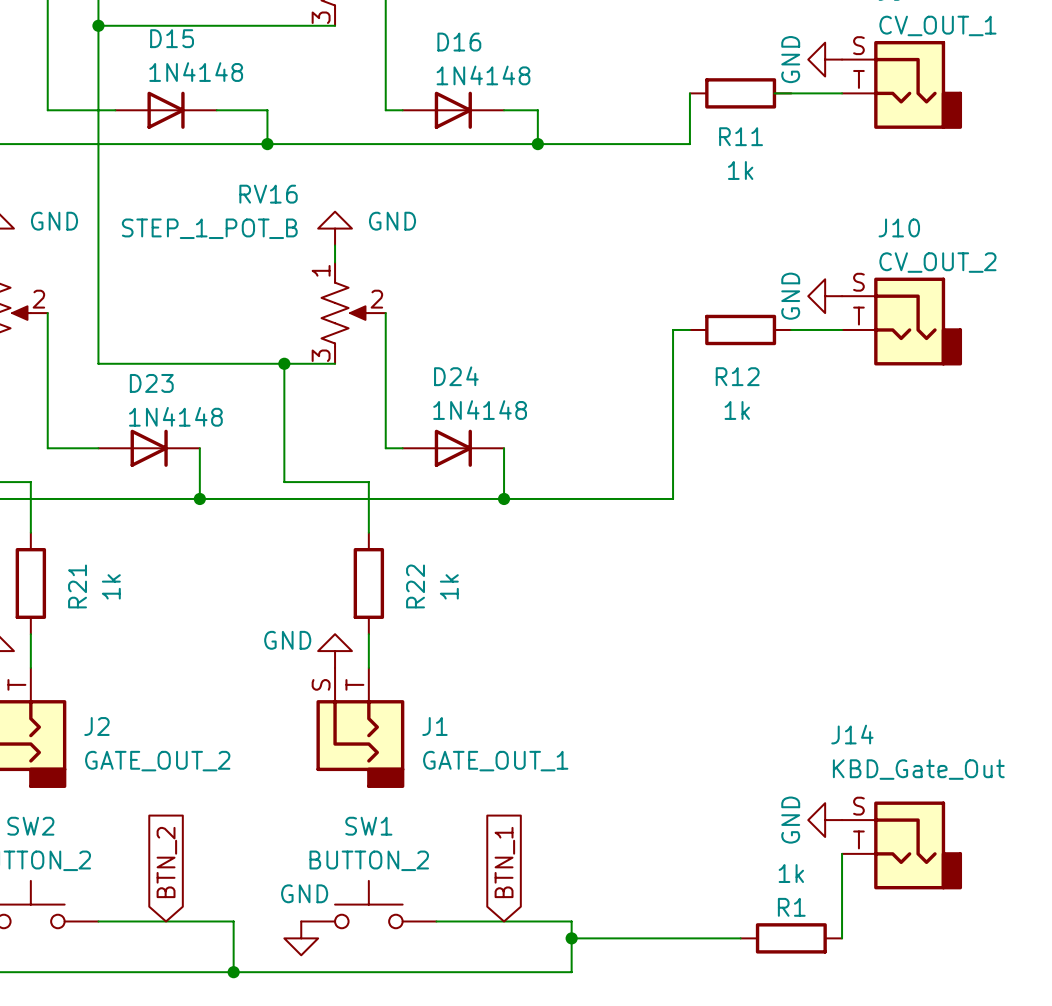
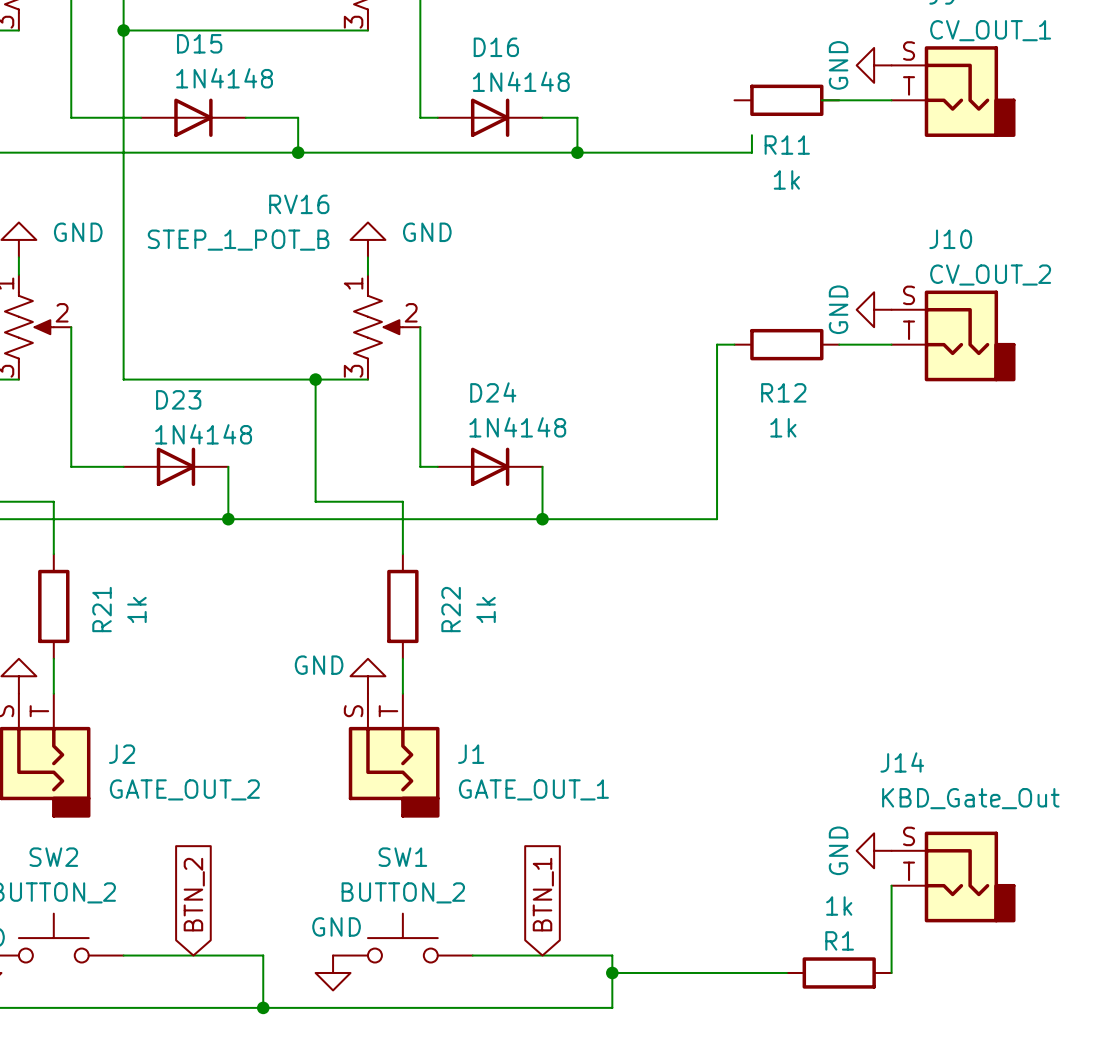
wire: (689, 93) (689, 144) -> (751, 135) (751, 152) (734, 152)

